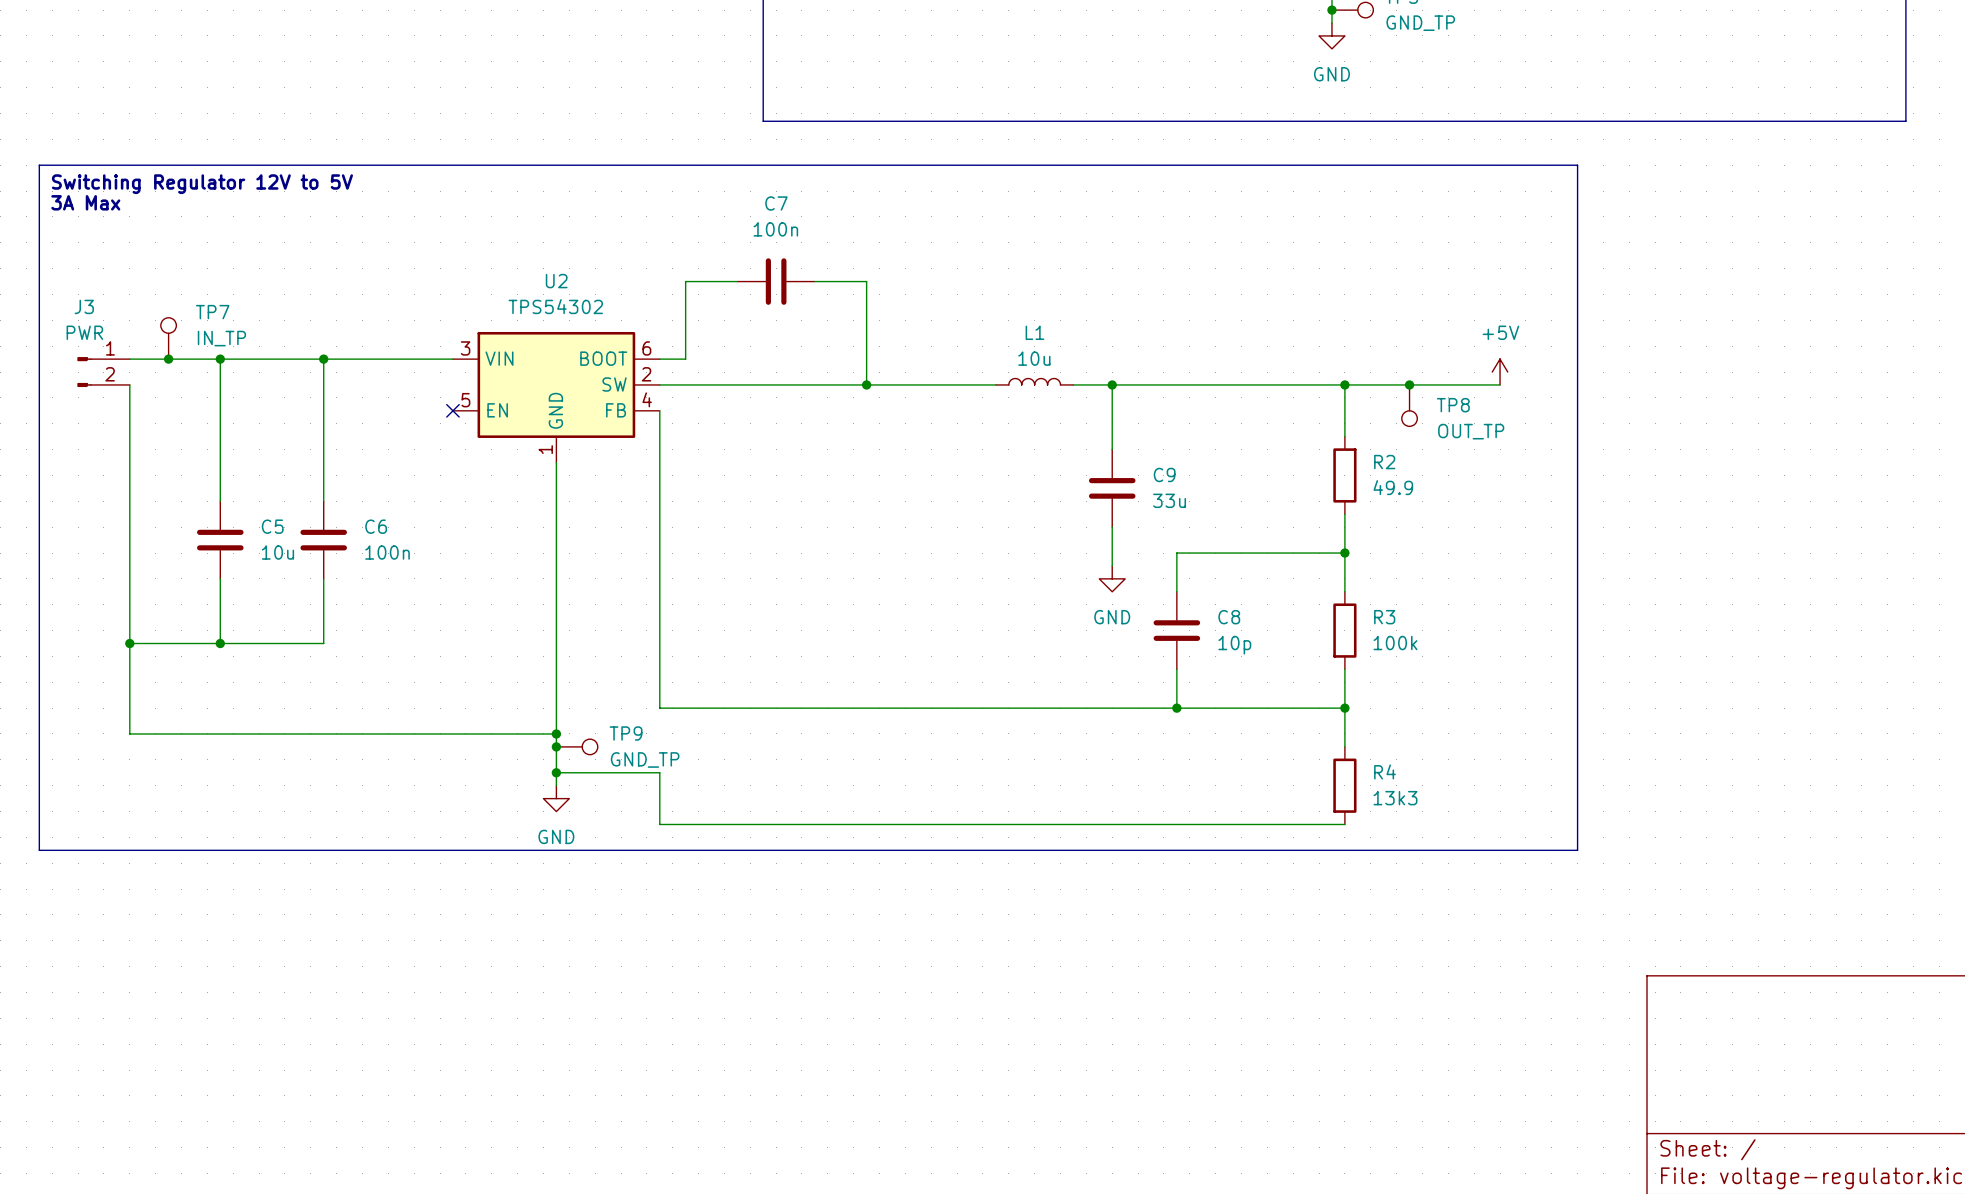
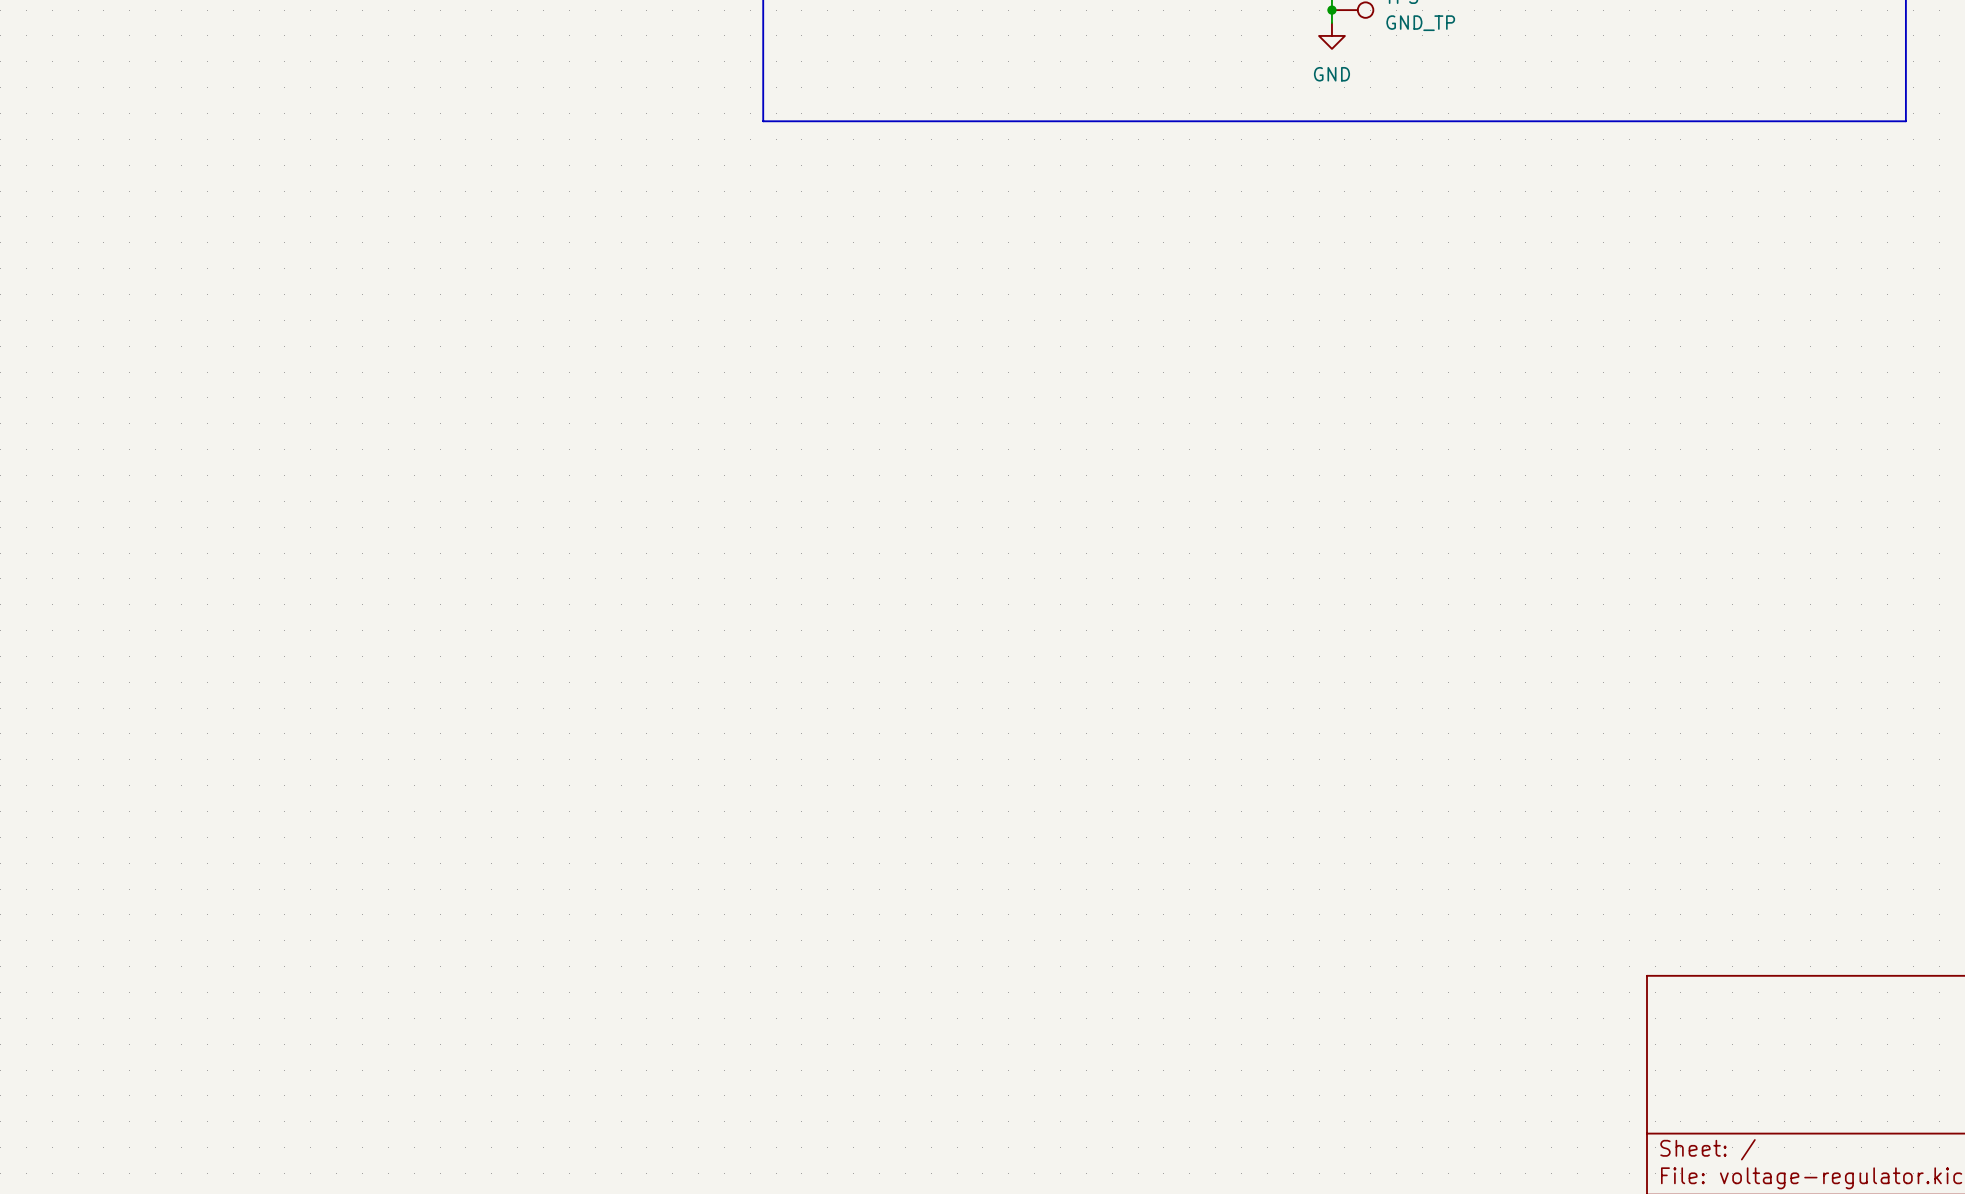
line: (39, 165) (1577, 165) (1577, 850) (39, 850) (39, 165) -> none
text: Switching Regulator 12V to 5V (202, 184) -> none
text: 3A Max (85, 202) -> none
wire: (737, 281) (685, 281) (685, 359) (659, 359) -> none
C7: 100n (776, 281) -> none
wire: (814, 281) (866, 281) (866, 384) -> none
TP7: IN_TP (168, 338) -> none
wire: (129, 359) (452, 359) -> none
junction: (168, 359) -> none
wire: (220, 359) (220, 501) -> none
junction: (220, 359) -> none
wire: (323, 359) (323, 501) -> none
junction: (323, 359) -> none
J3: PWR (103, 372) -> none
power symbol: +5V (1500, 372) -> none
L1: 10u (1034, 381) -> none
wire: (129, 384) (129, 733) (556, 733) -> none
wire: (659, 384) (995, 384) -> none
junction: (866, 384) -> none
wire: (1073, 384) (1500, 384) -> none
wire: (1112, 384) (1112, 449) -> none
junction: (1112, 384) -> none
wire: (1344, 384) (1344, 436) -> none
junction: (1344, 384) -> none
junction: (1409, 384) -> none
U2: TPS54302 (556, 397) -> none
TP8: OUT_TP (1409, 405) -> none
no-connect mark: (452, 410) -> none
wire: (659, 410) (659, 708) (1344, 708) -> none
wire: (556, 462) (556, 785) -> none
R2: 49.9 (1344, 475) -> none
C9: 33u (1112, 488) -> none
wire: (1344, 514) (1344, 591) -> none
wire: (1112, 527) (1112, 565) -> none
C5: 10u (220, 540) -> none
C6: 100n (323, 540) -> none
wire: (1344, 553) (1176, 553) (1176, 591) -> none
junction: (1344, 553) -> none
wire: (220, 578) (220, 643) -> none
wire: (323, 578) (323, 643) (129, 643) -> none
power symbol: GND (1112, 578) -> none
C8: 10p (1176, 630) -> none
R3: 100k (1344, 630) -> none
junction: (129, 643) -> none
junction: (220, 643) -> none
wire: (1176, 669) (1176, 708) -> none
wire: (1344, 669) (1344, 746) -> none
junction: (1176, 708) -> none
junction: (1344, 708) -> none
junction: (556, 733) -> none
junction: (556, 746) -> none
TP9: GND_TP (577, 746) -> none
wire: (556, 772) (659, 772) (659, 824) (1344, 824) -> none
junction: (556, 772) -> none
R4: 13k3 (1344, 785) -> none
power symbol: GND (556, 798) -> none

